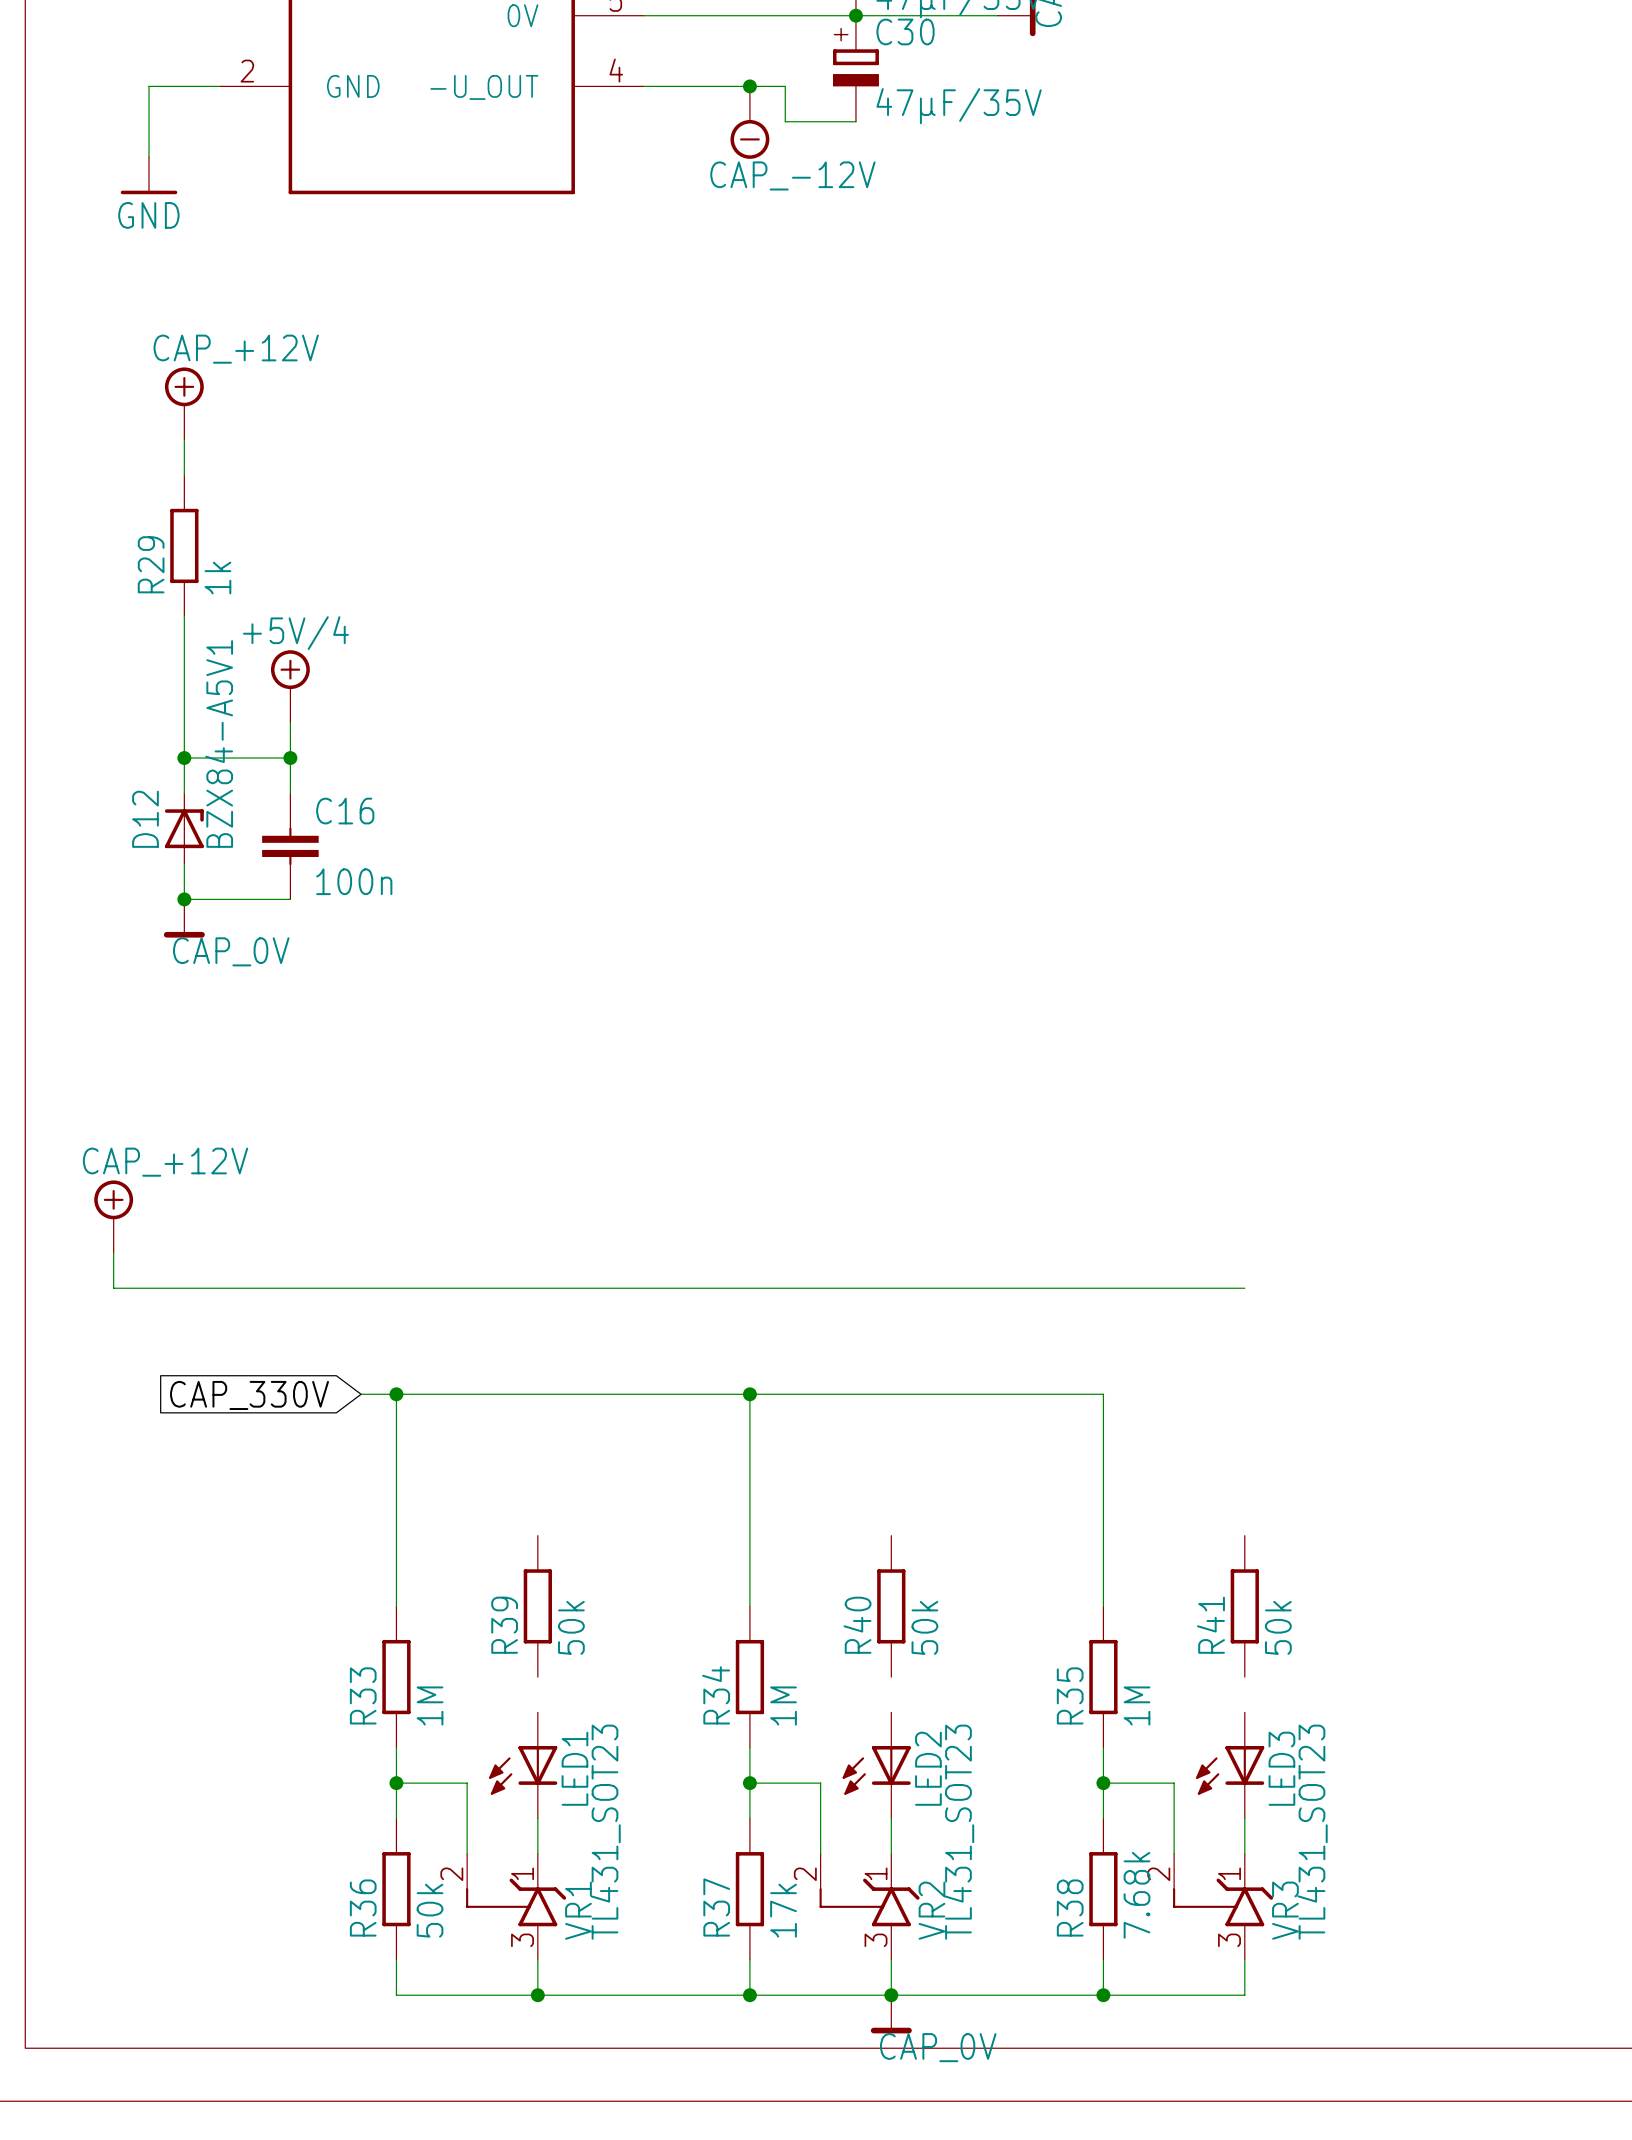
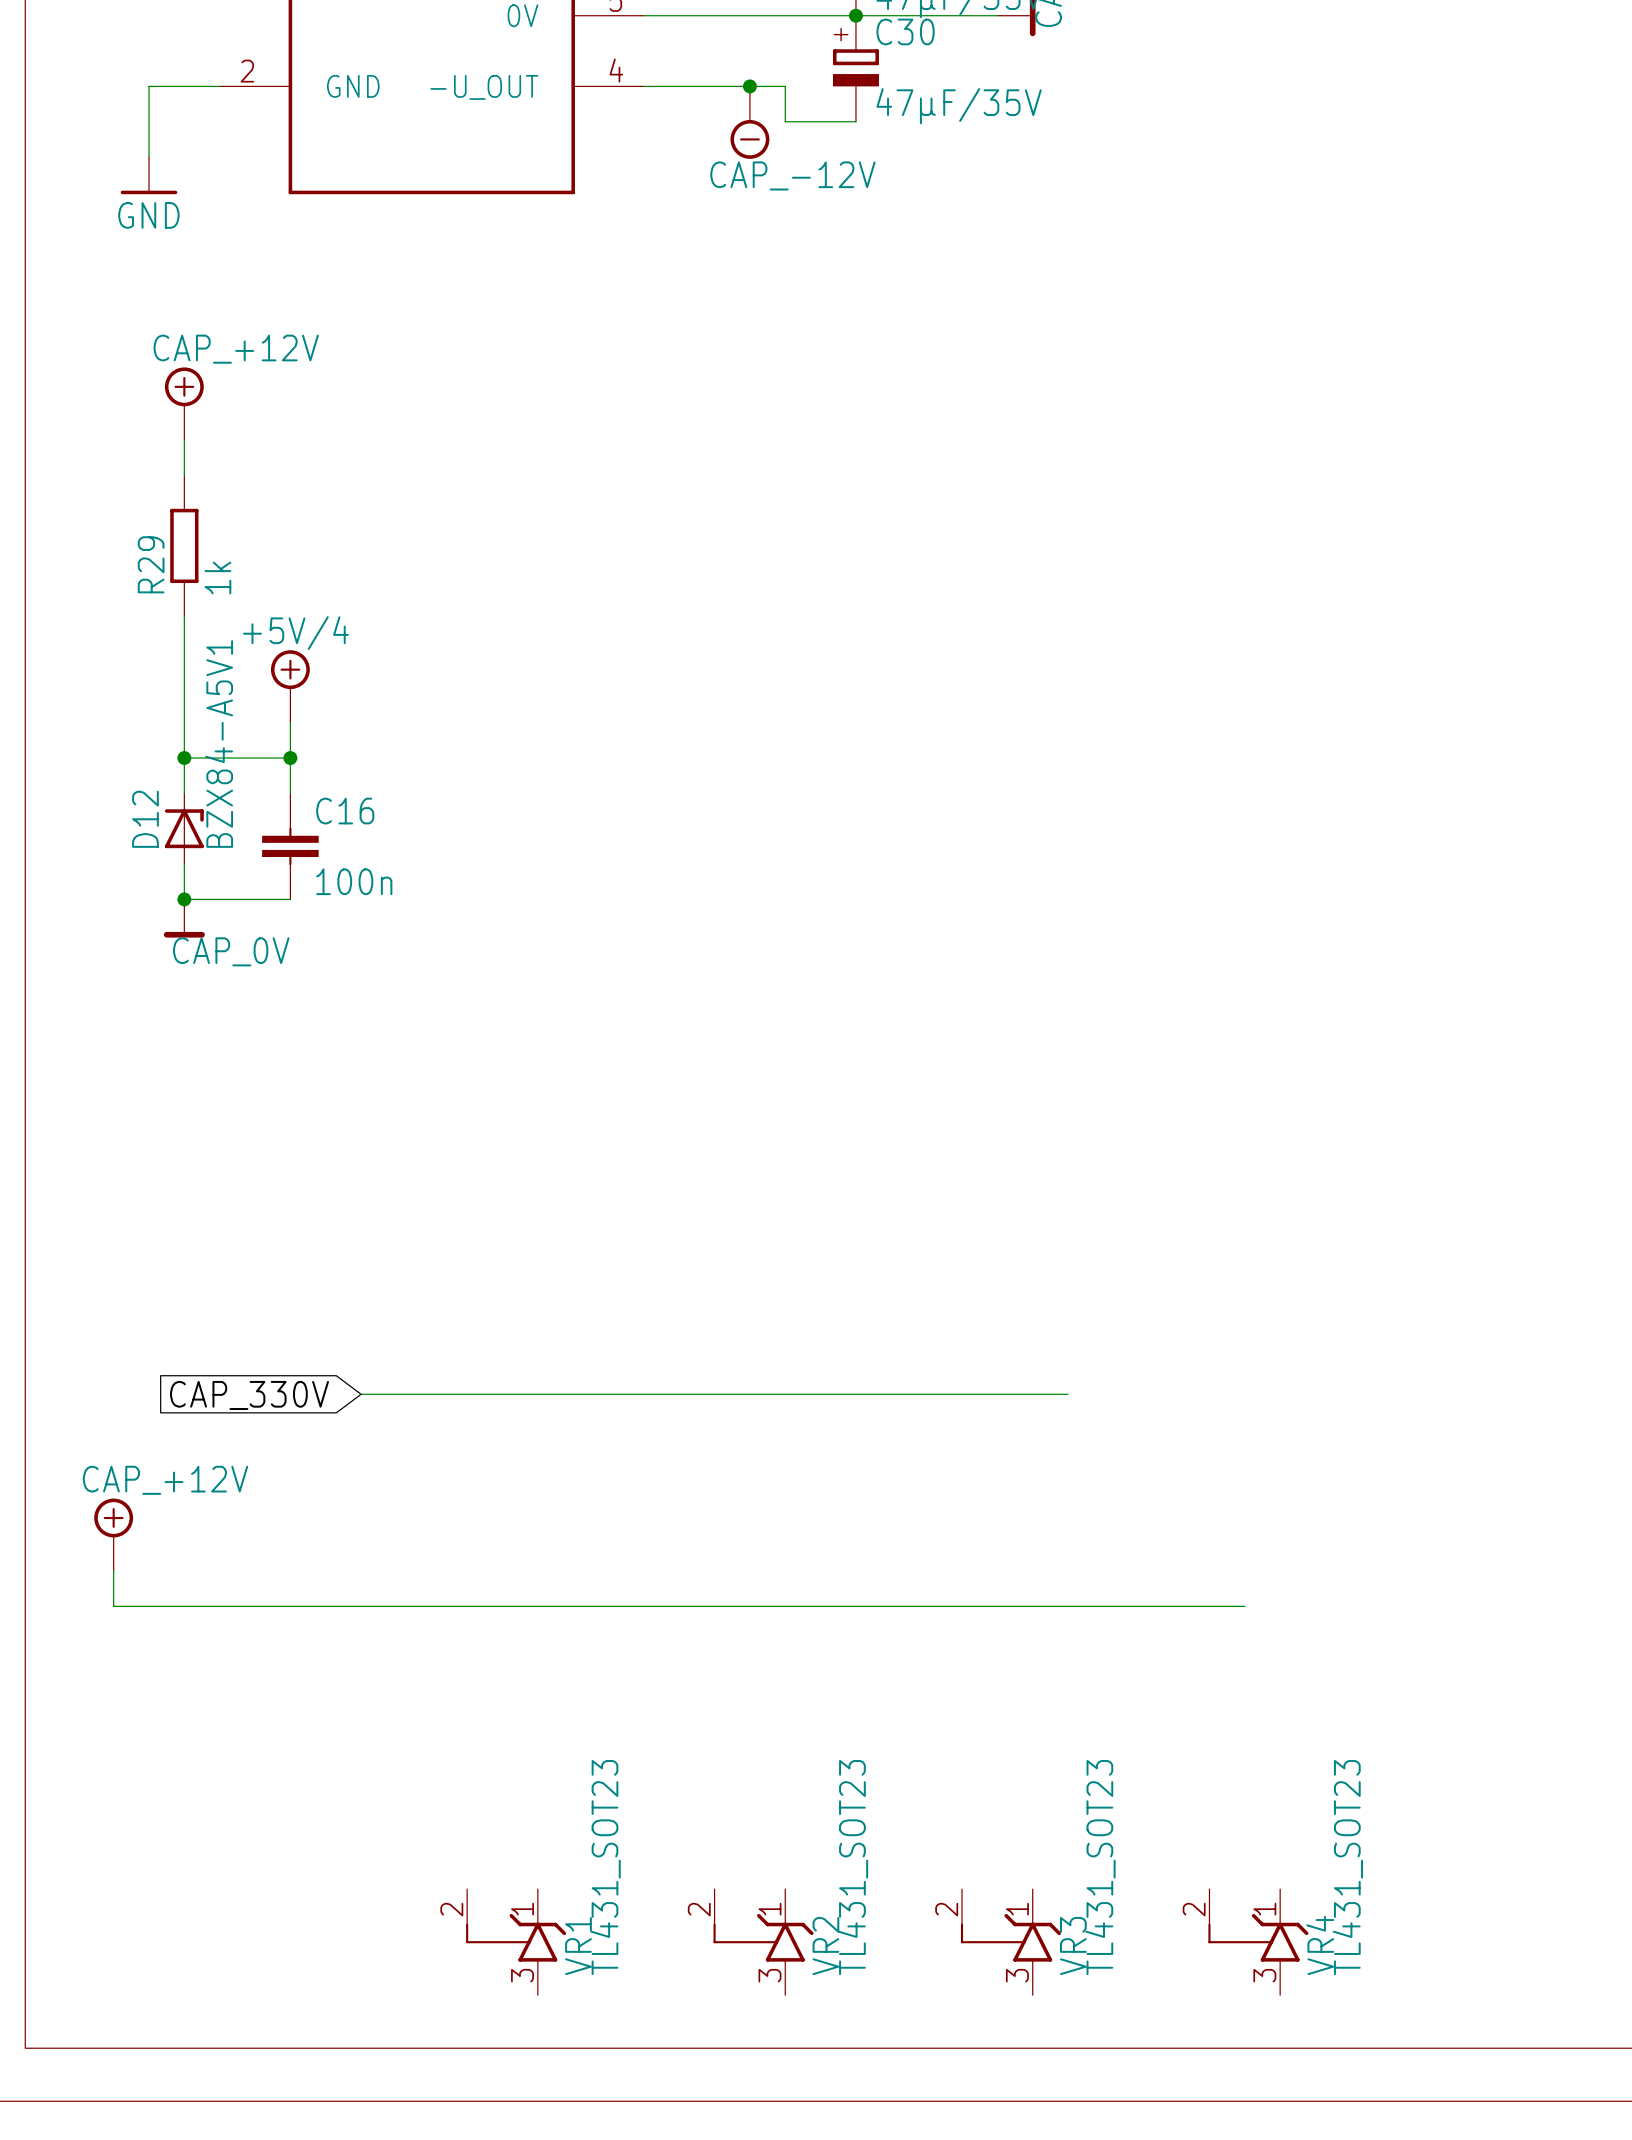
power symbol position: CAP_+12V (113, 1216) -> CAP_+12V (113, 1534)
wire: (113, 1252) (113, 1288) (1244, 1288) -> (113, 1571) (113, 1606) (1244, 1606)
wire: (396, 1394) (396, 1606) -> none
junction: (396, 1394) -> none
wire: (749, 1394) (749, 1606) -> none
junction: (749, 1394) -> none
wire: (1068, 1394) (1103, 1394) (1103, 1606) -> none
R39: 50k (537, 1606) -> none
R40: 50k (891, 1606) -> none
R41: 50k (1244, 1606) -> none
R33: 1M (396, 1677) -> none
R34: 1M (749, 1677) -> none
R35: 1M (1103, 1677) -> none
wire: (396, 1747) (396, 1818) -> none
wire: (749, 1747) (749, 1818) -> none
wire: (1103, 1747) (1103, 1818) -> none
LED1: (523, 1765) -> none
LED2: (876, 1765) -> none
LED3: (1230, 1765) -> none
wire: (396, 1783) (467, 1783) (467, 1853) -> none
junction: (396, 1783) -> none
wire: (749, 1783) (820, 1783) (820, 1853) -> none
junction: (749, 1783) -> none
wire: (1103, 1783) (1174, 1783) (1174, 1853) -> none
junction: (1103, 1783) -> none
wire: (537, 1818) (537, 1853) -> none
wire: (891, 1818) (891, 1853) -> none
wire: (1244, 1818) (1244, 1853) -> none
R36: 50k (396, 1889) -> none
R37: 17k (749, 1889) -> none
R38: 7.68k (1103, 1889) -> none
VR1 position: (516, 1906) -> (516, 1942)
VR2 position: (869, 1906) -> (763, 1942)
VR3 position: (1223, 1906) -> (1010, 1942)
VR4: none -> TL431_SOT23 (1258, 1942)
wire: (396, 1959) (396, 1995) (1244, 1995) (1244, 1959) -> none
wire: (749, 1959) (749, 1995) -> none
wire: (891, 1959) (891, 1995) -> none
wire: (1103, 1959) (1103, 1995) -> none
junction: (537, 1995) -> none
junction: (749, 1995) -> none
junction: (891, 1995) -> none
junction: (1103, 1995) -> none
power symbol: CAP_0V (891, 2014) -> none

